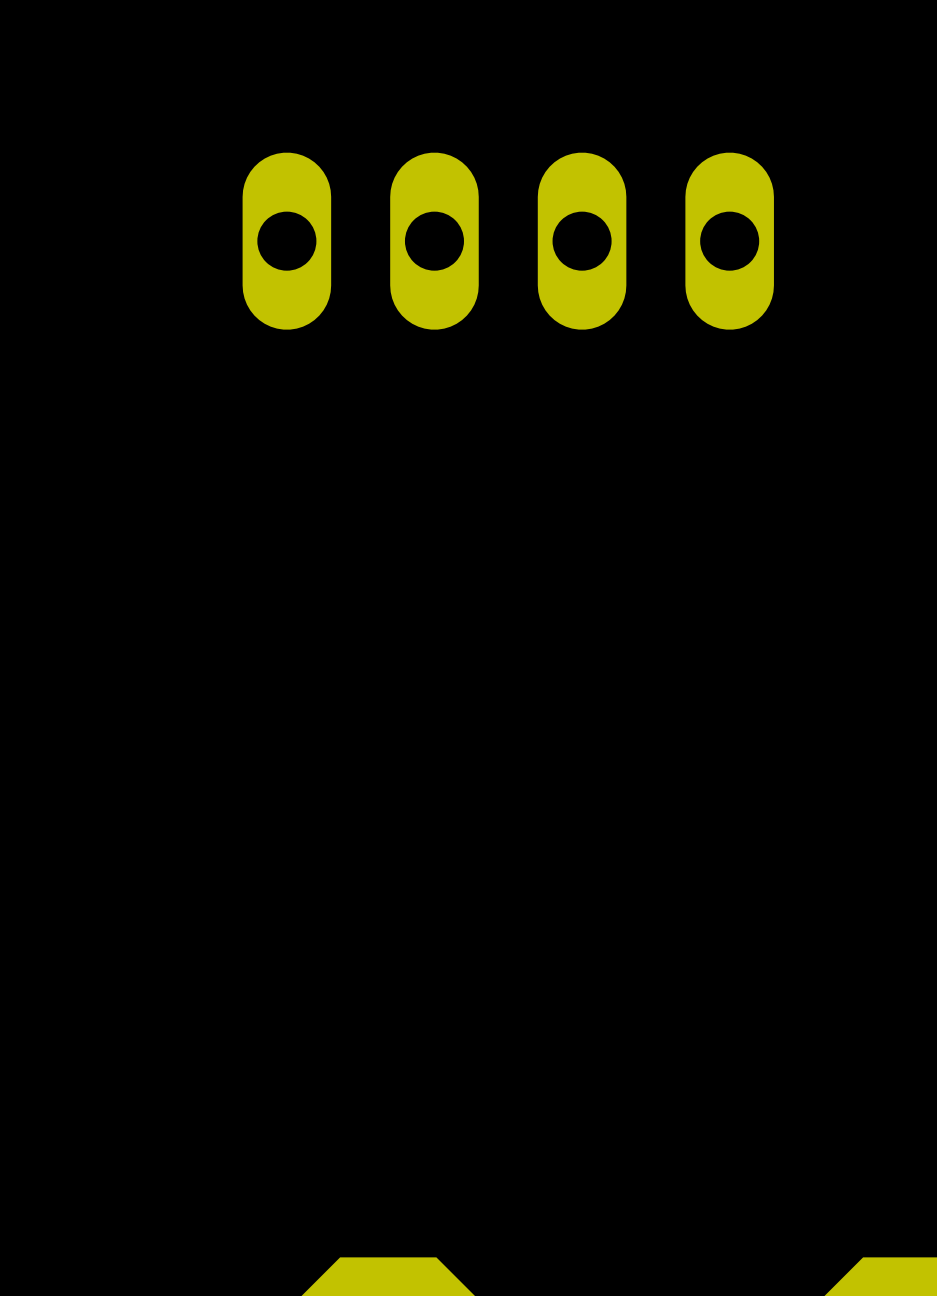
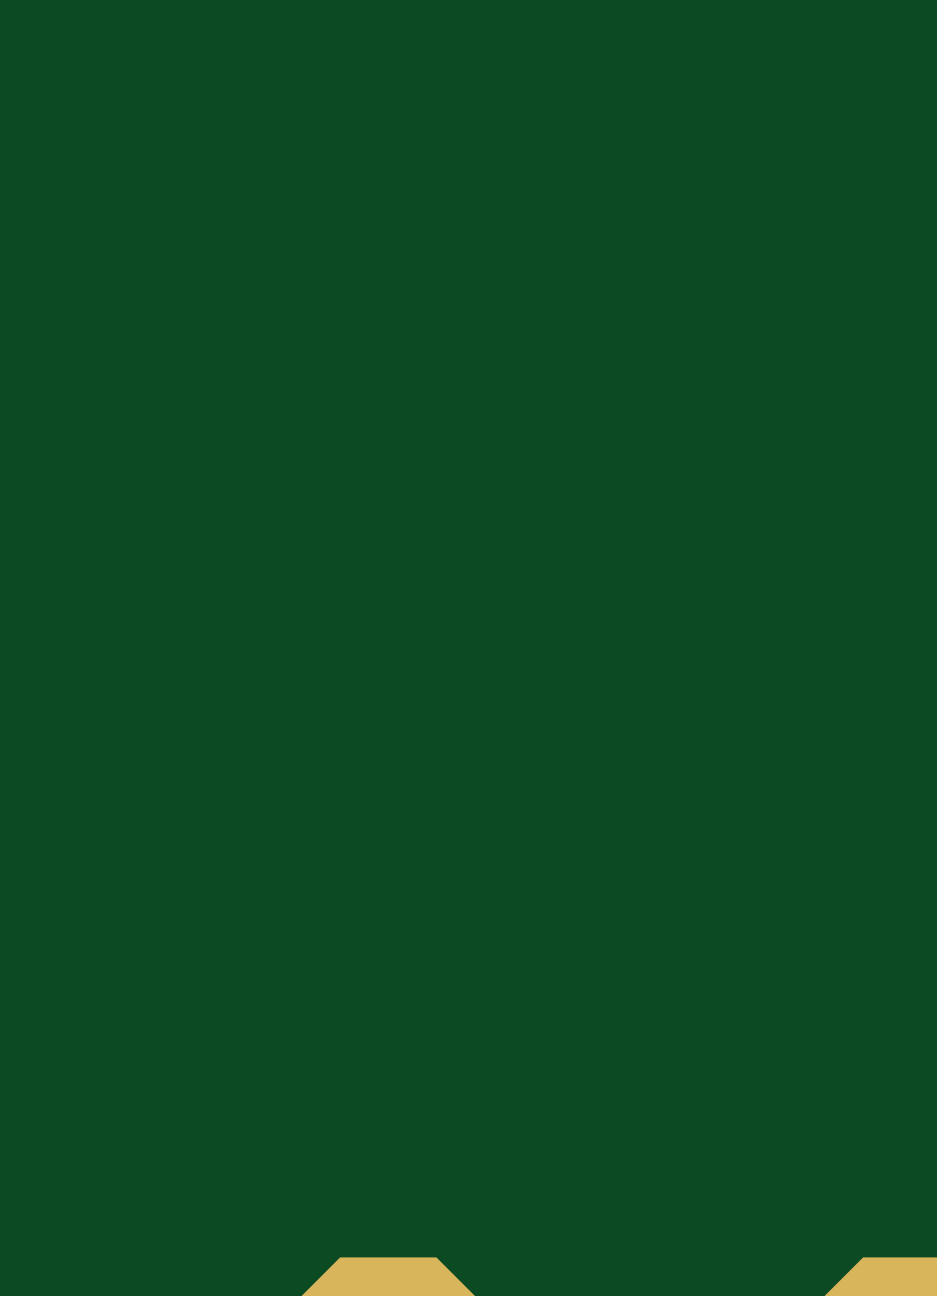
part: (508, 241) -> none

